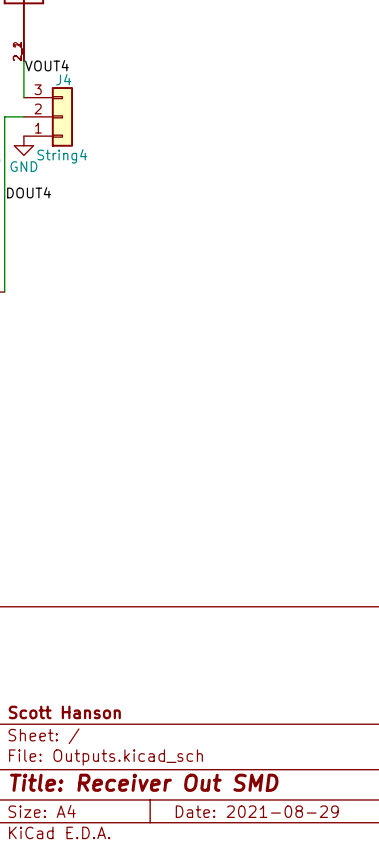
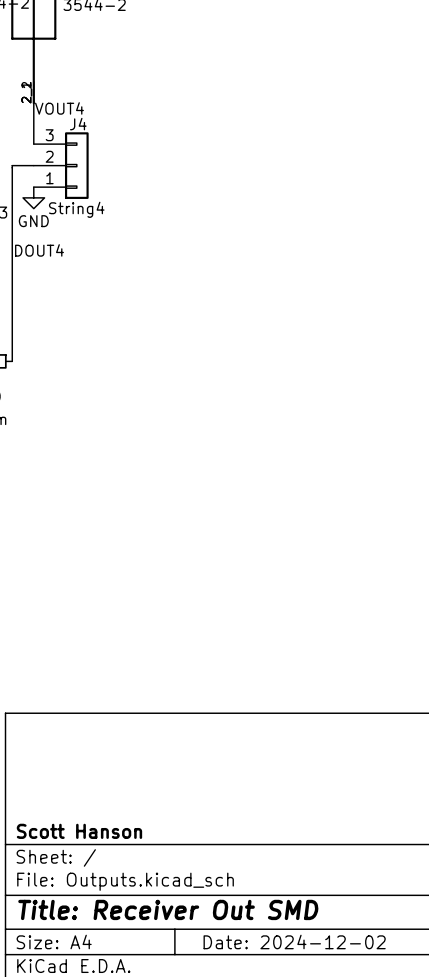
title block: Date: 2021-08-29 (257, 811) -> Date: 2024-12-02 (294, 941)

